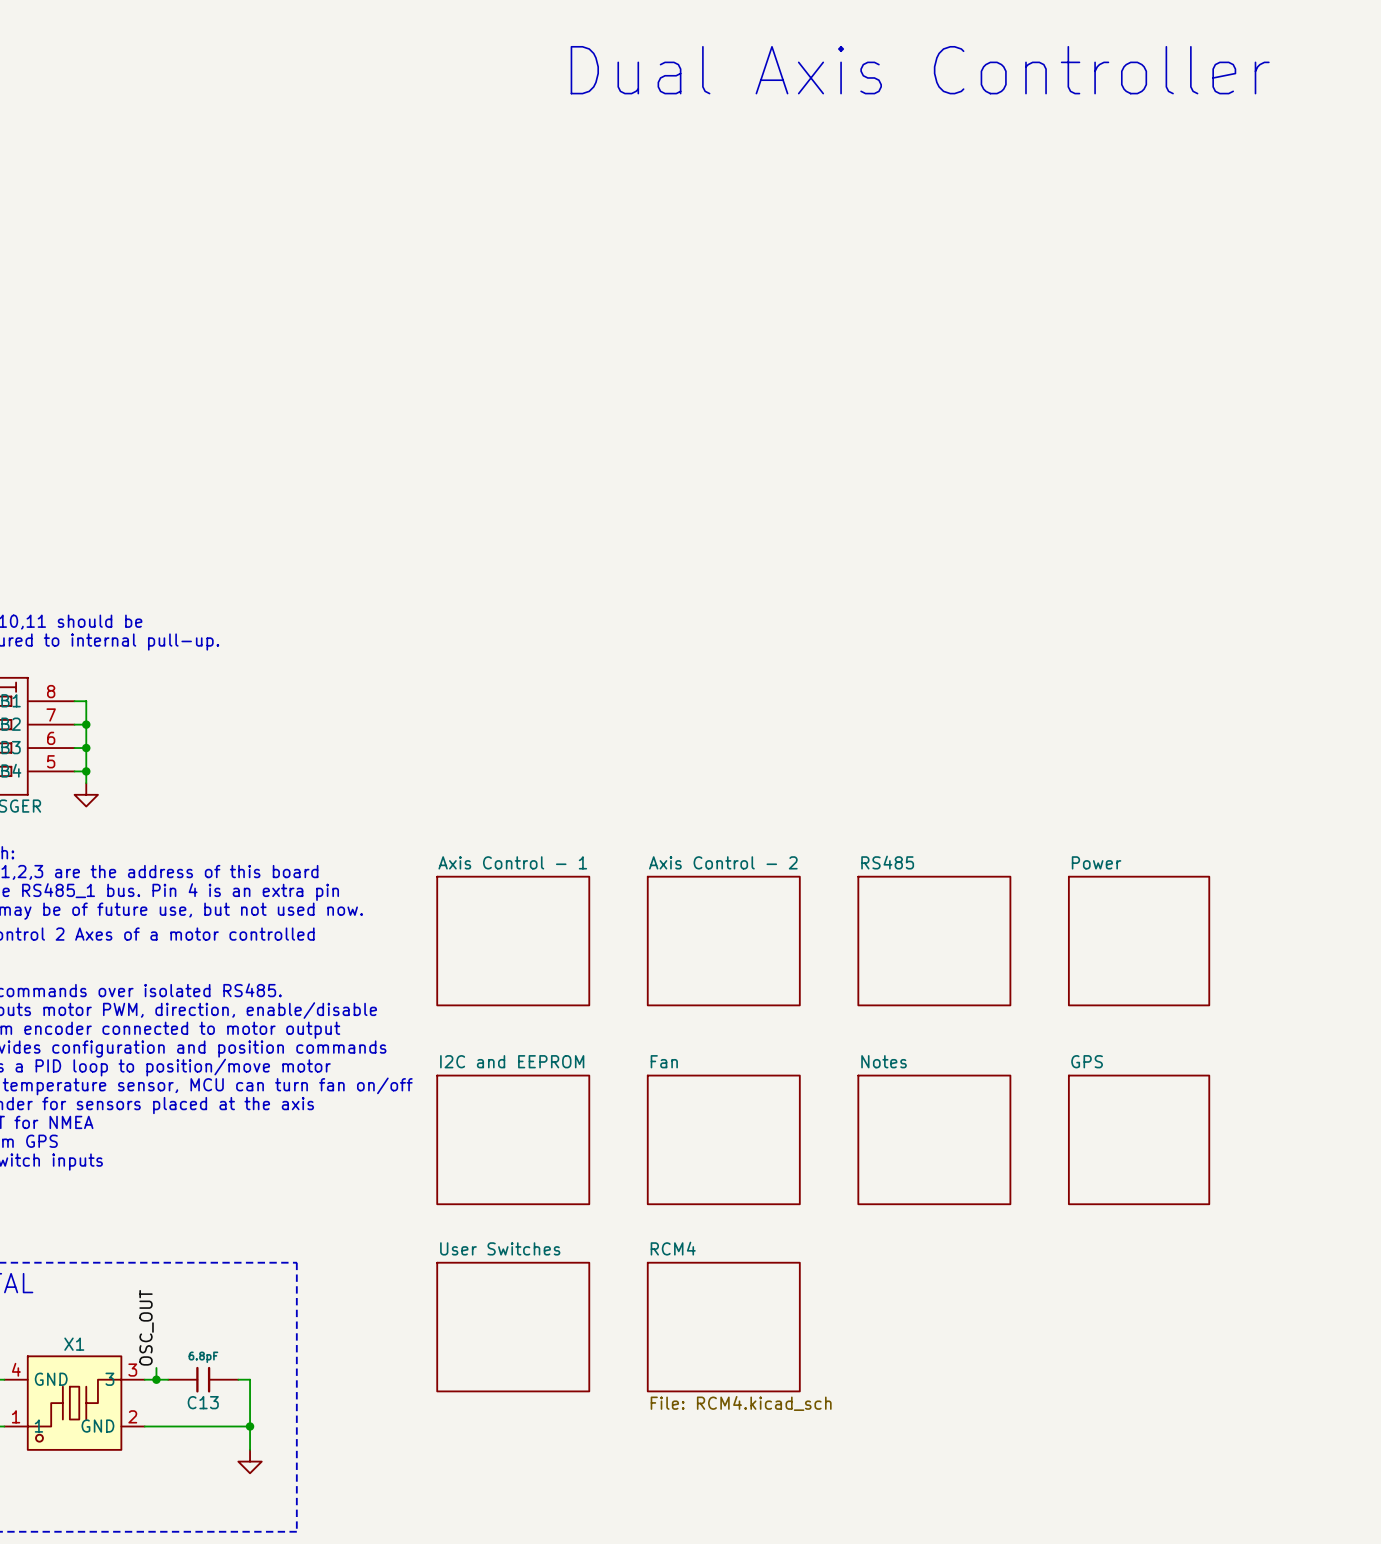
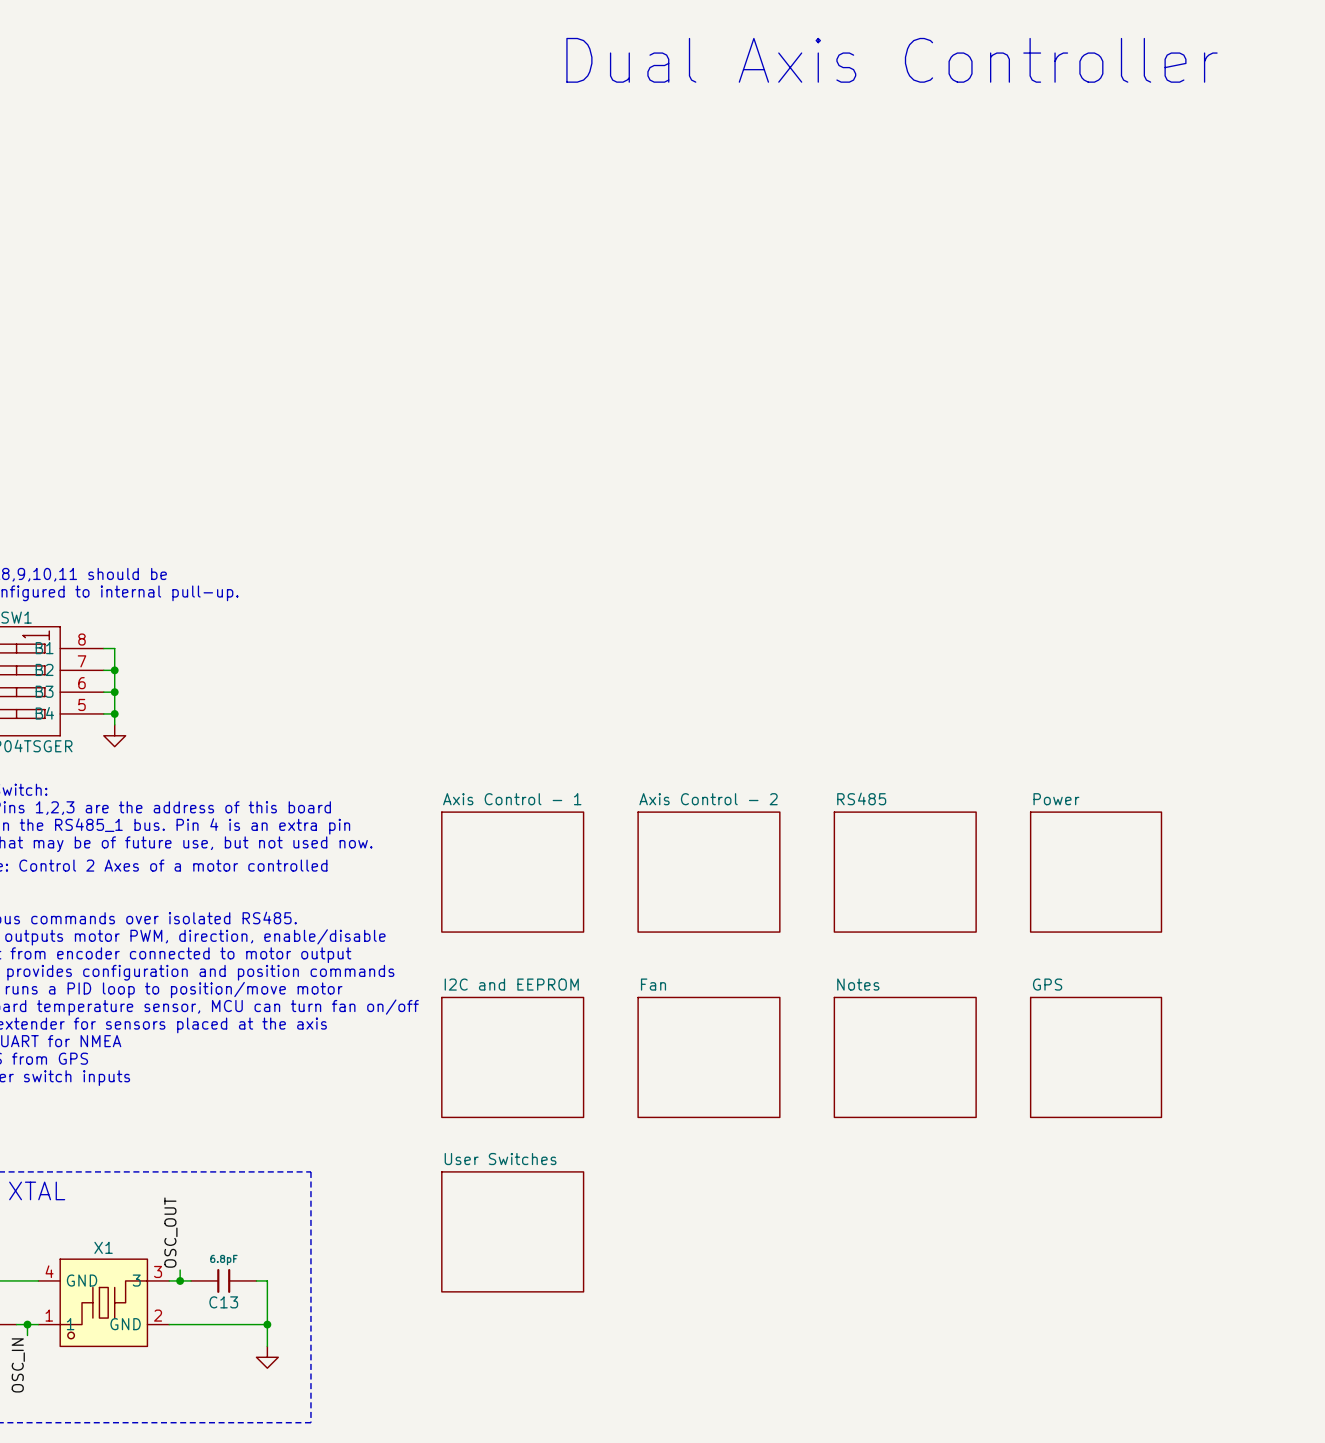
sheet RCM4: File: RCM4.kicad_sch (723, 1327) -> none

